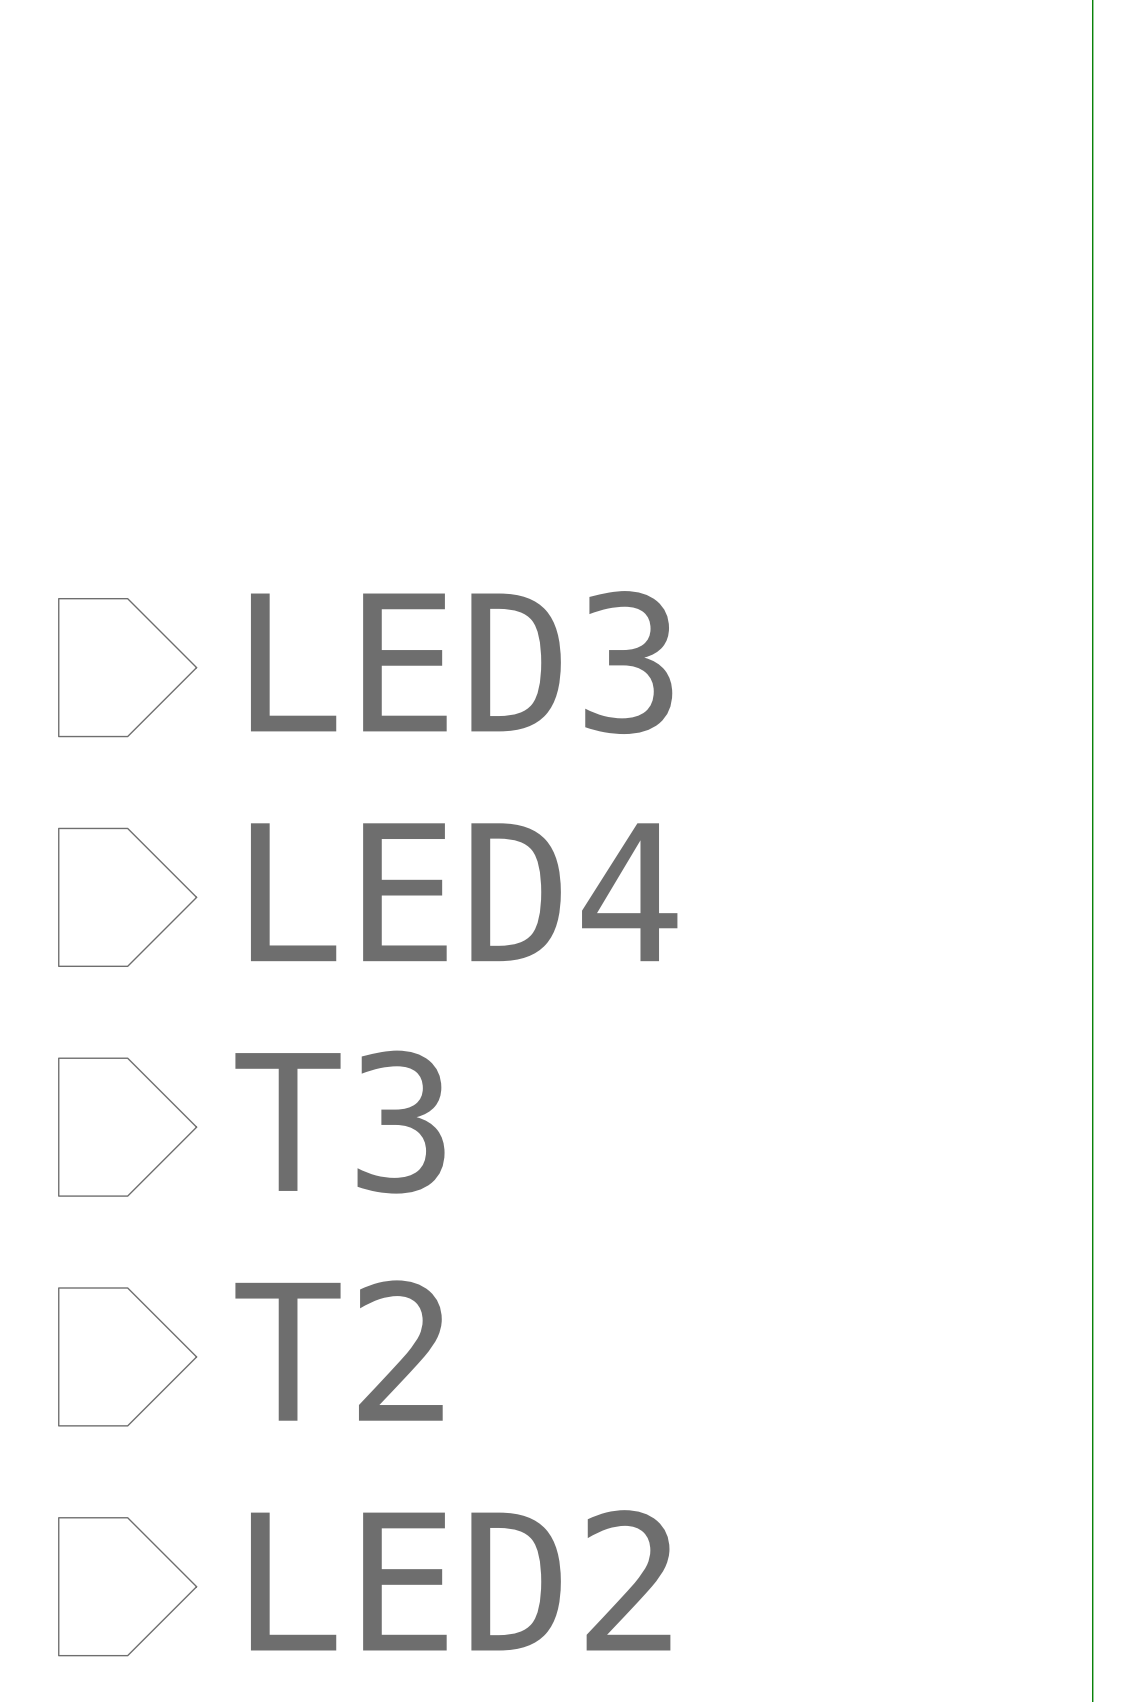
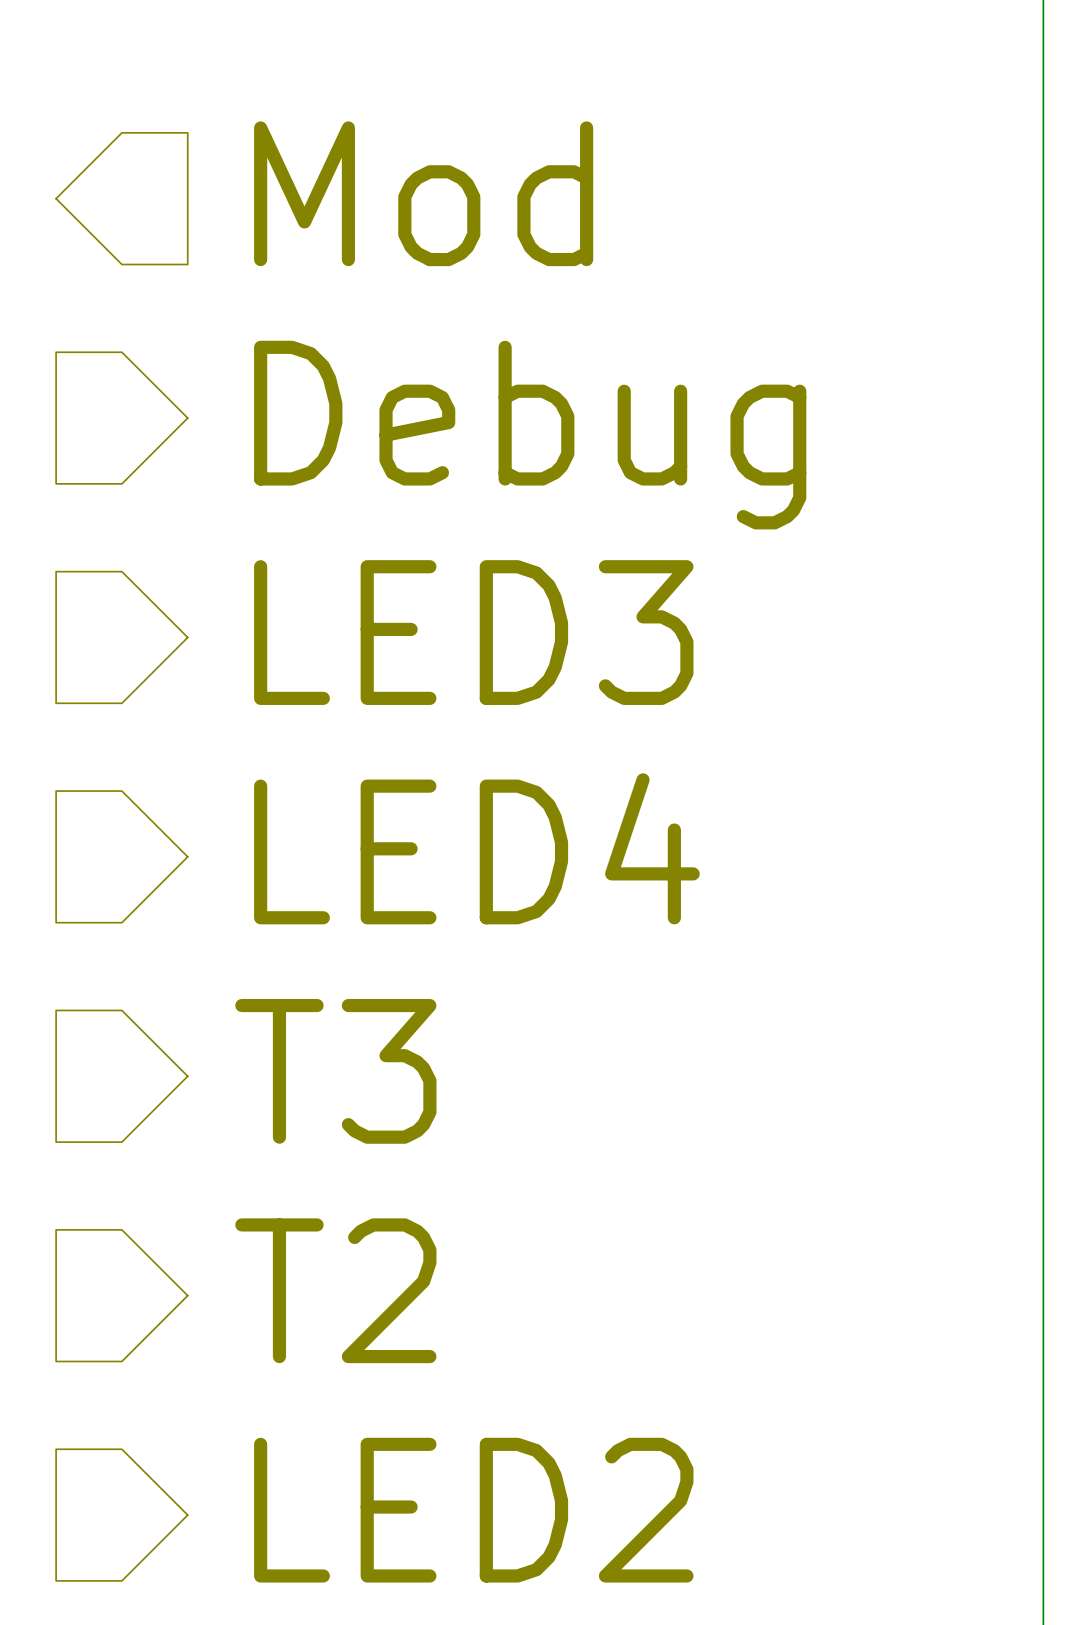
hierarchical label: none -> Mod (423, 193)
hierarchical label: none -> Debug (530, 435)

